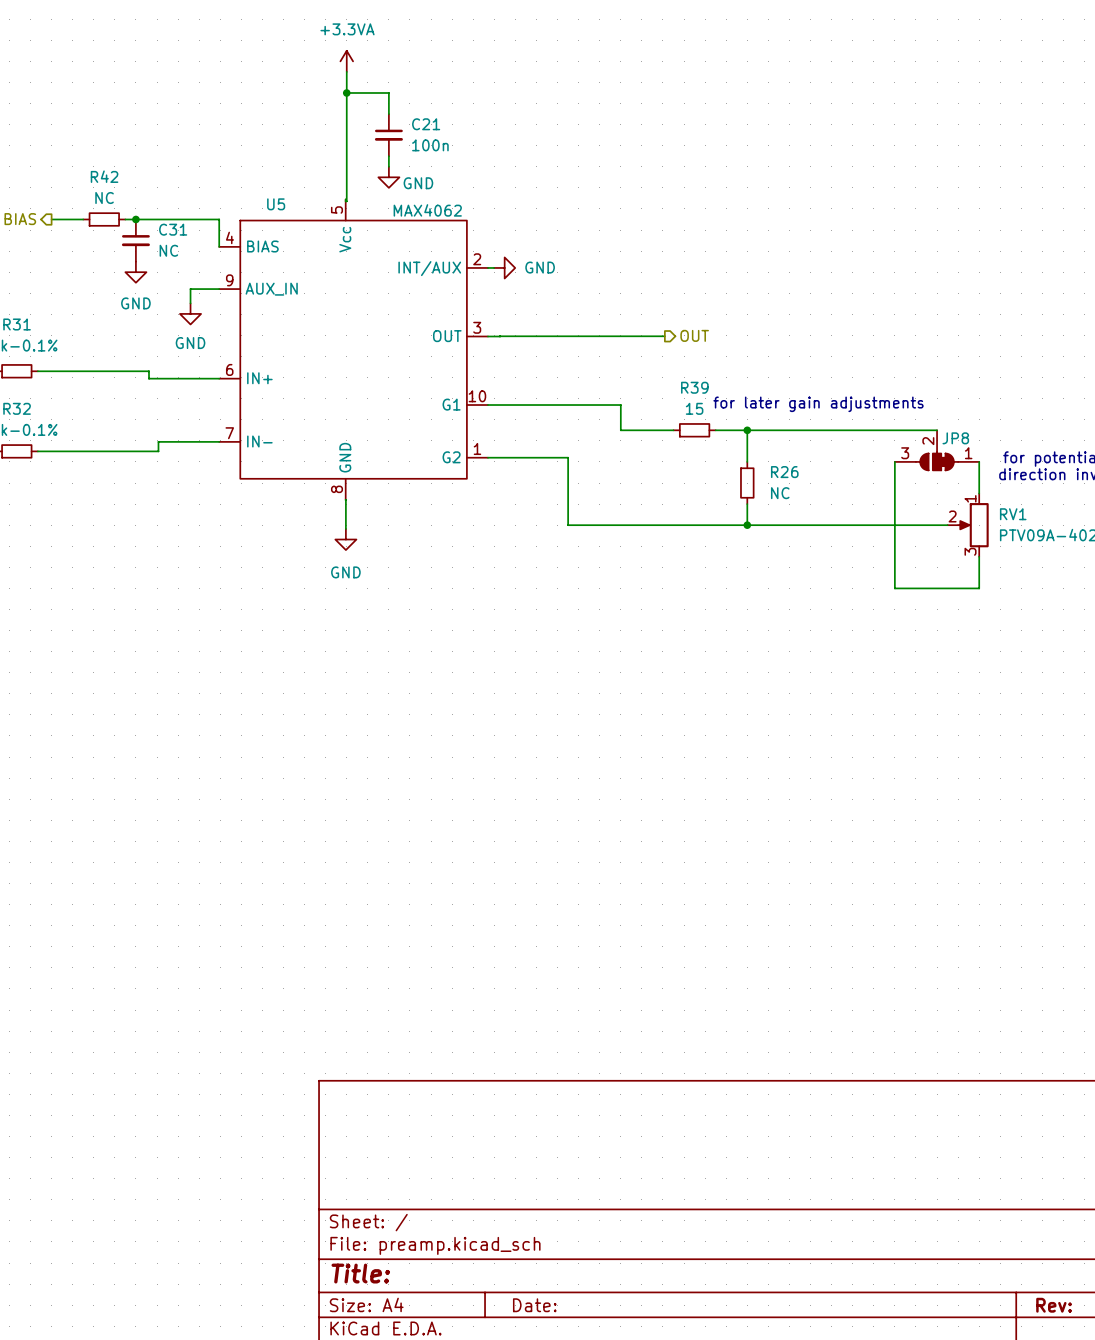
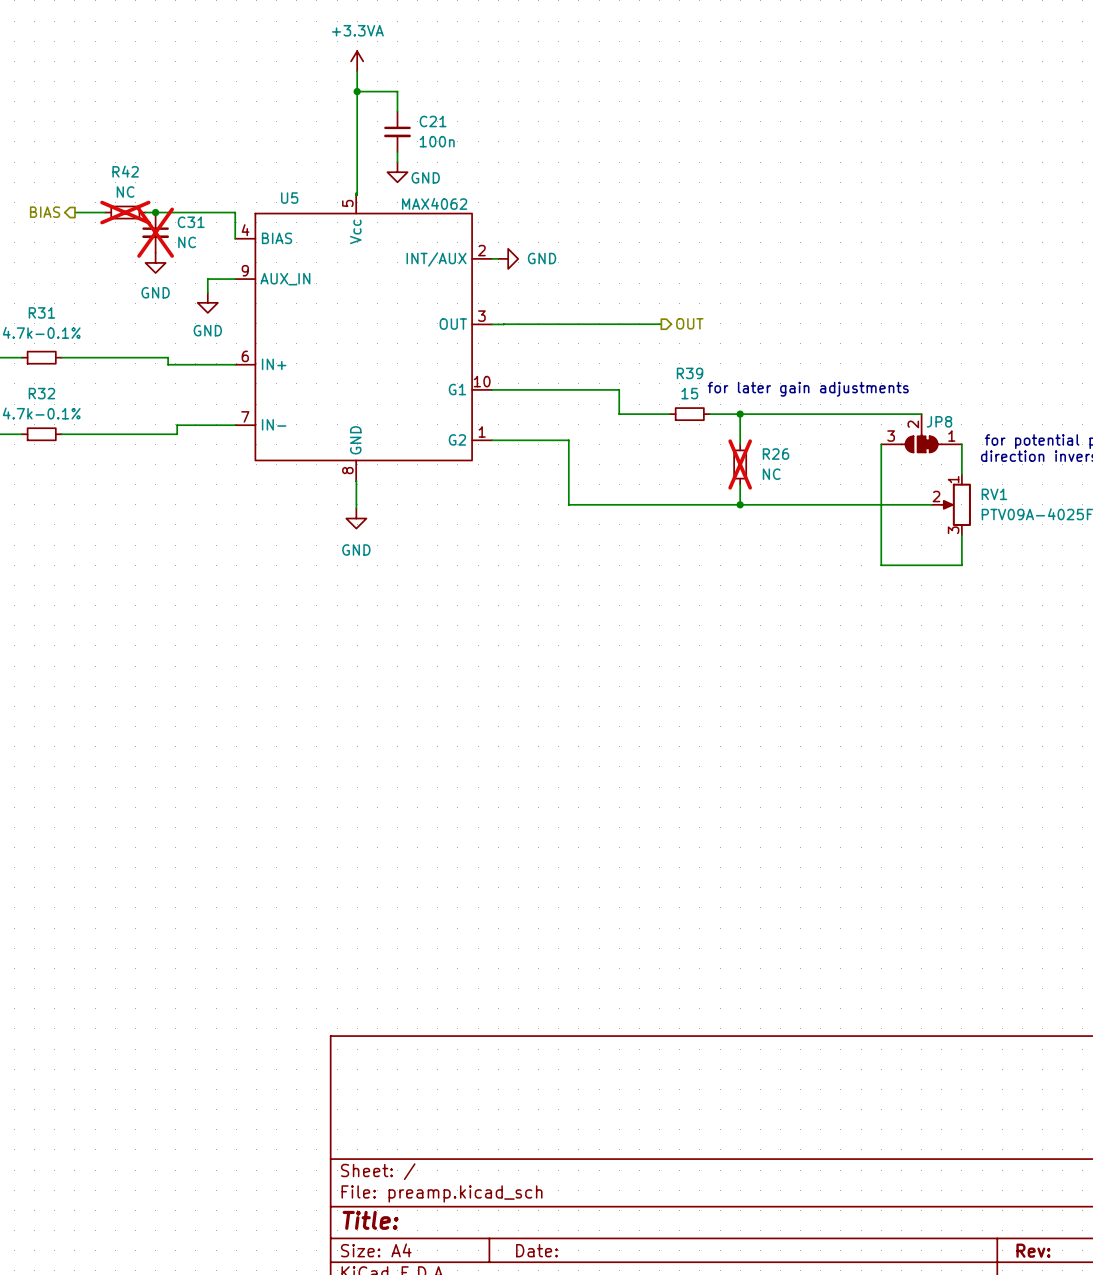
R42 do-not-place cross: none -> (125, 212)
C31 do-not-place cross: none -> (155, 232)
R26 do-not-place cross: none -> (740, 464)

